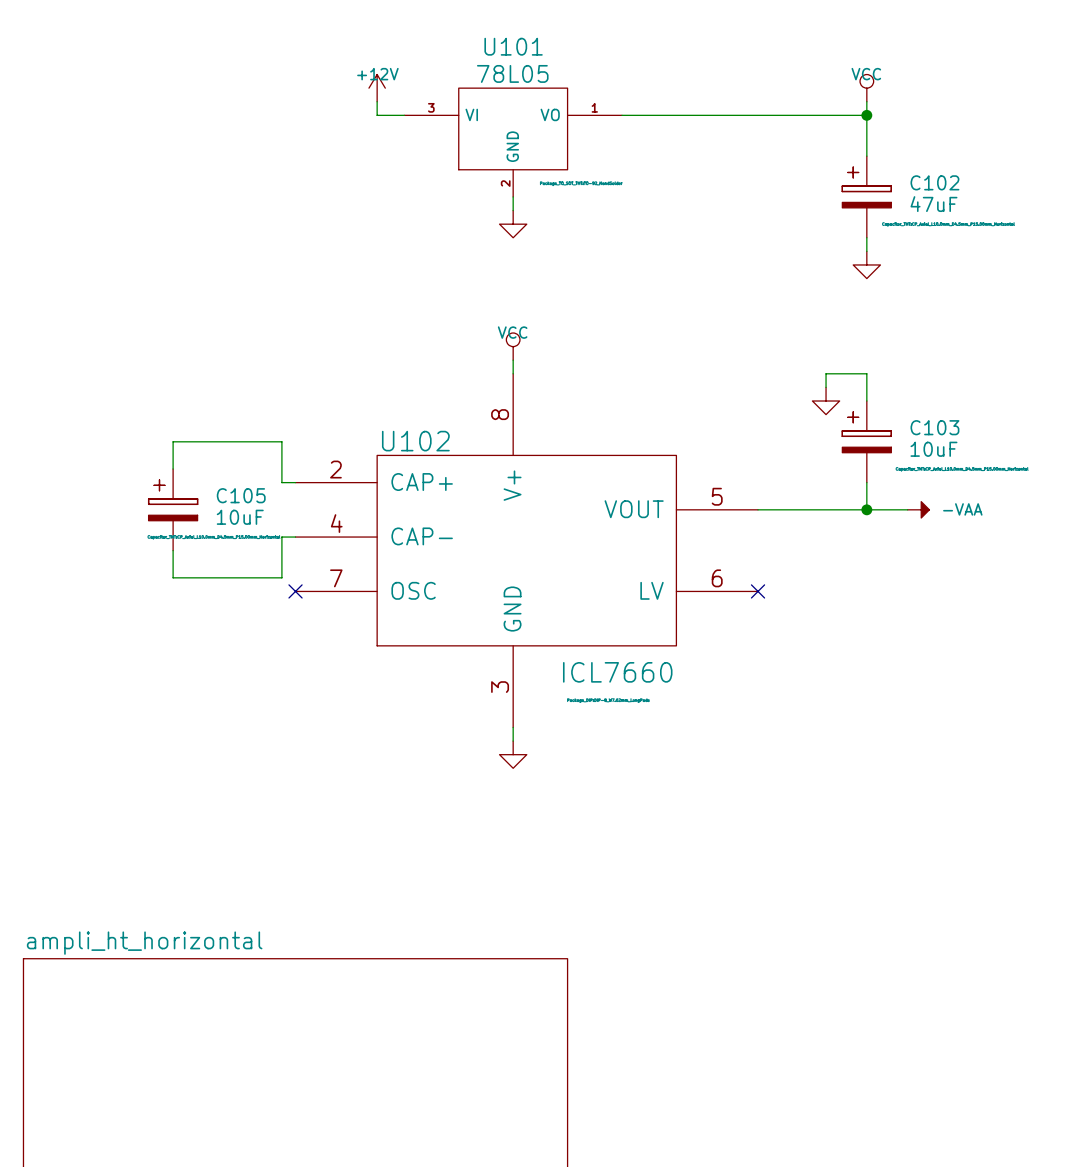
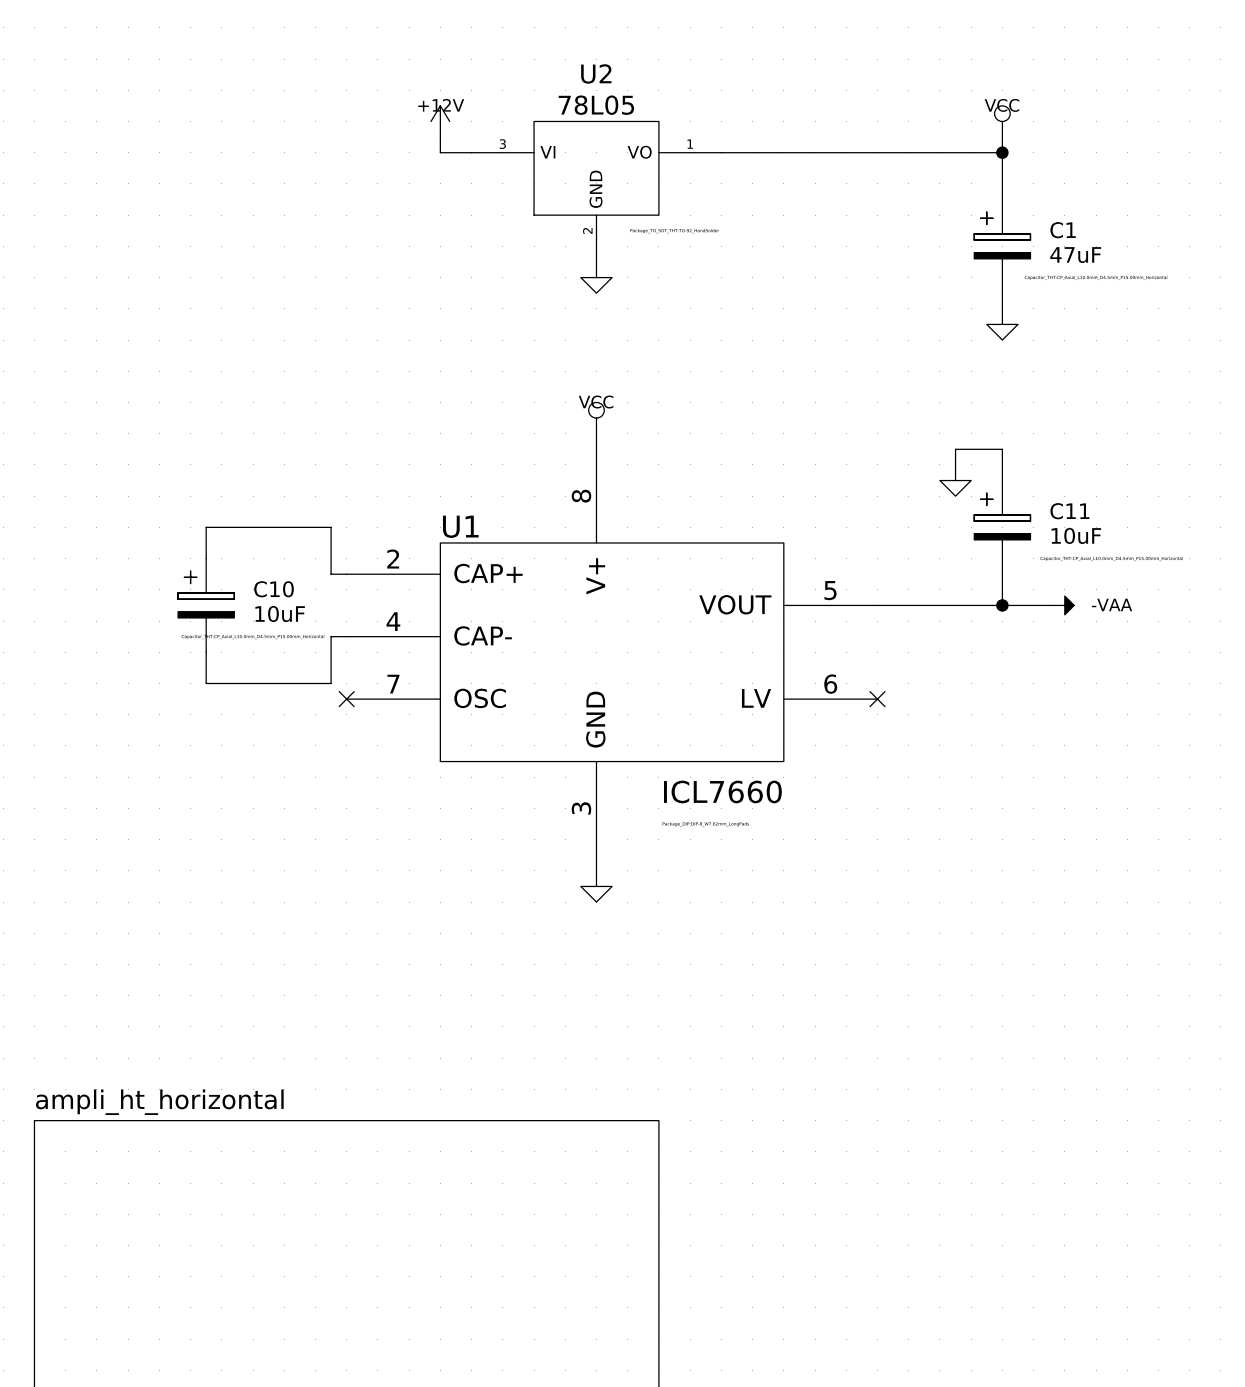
U101 name: U101 (513, 46) -> U2 (596, 73)
C102 name: C102 (934, 182) -> C1 (1063, 230)
C103 name: C103 (934, 427) -> C11 (1069, 511)
U102 name: U102 (415, 441) -> U1 (460, 526)
C105 name: C105 (241, 495) -> C10 (274, 589)

